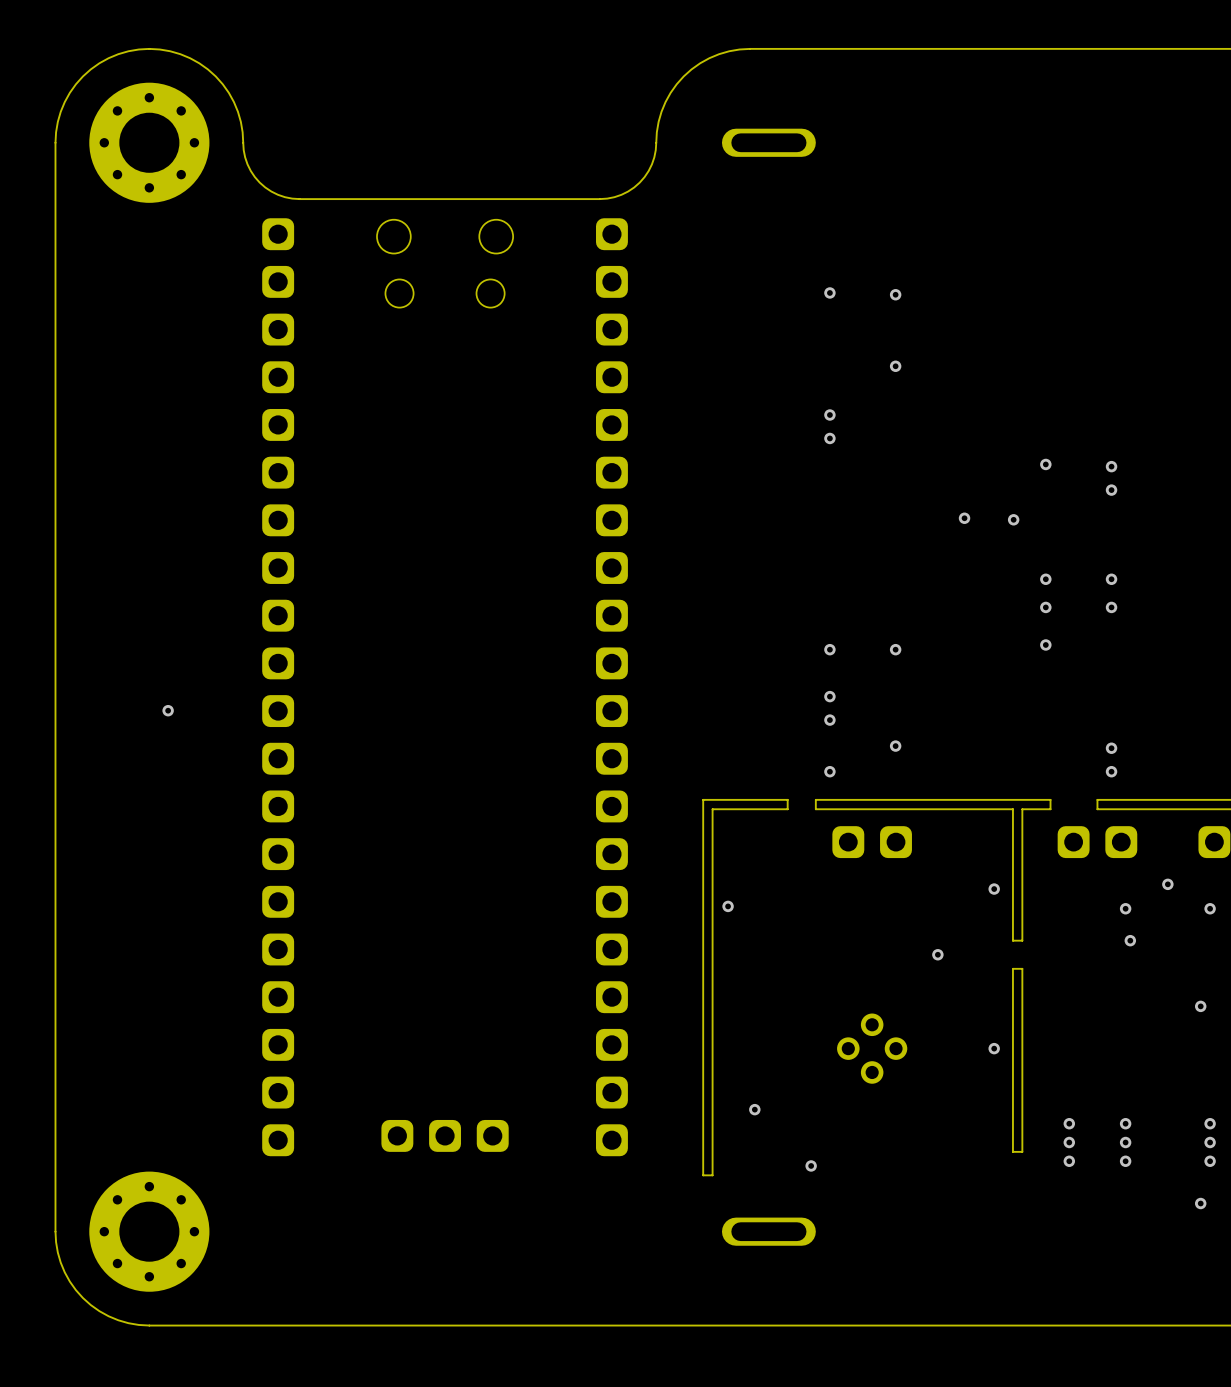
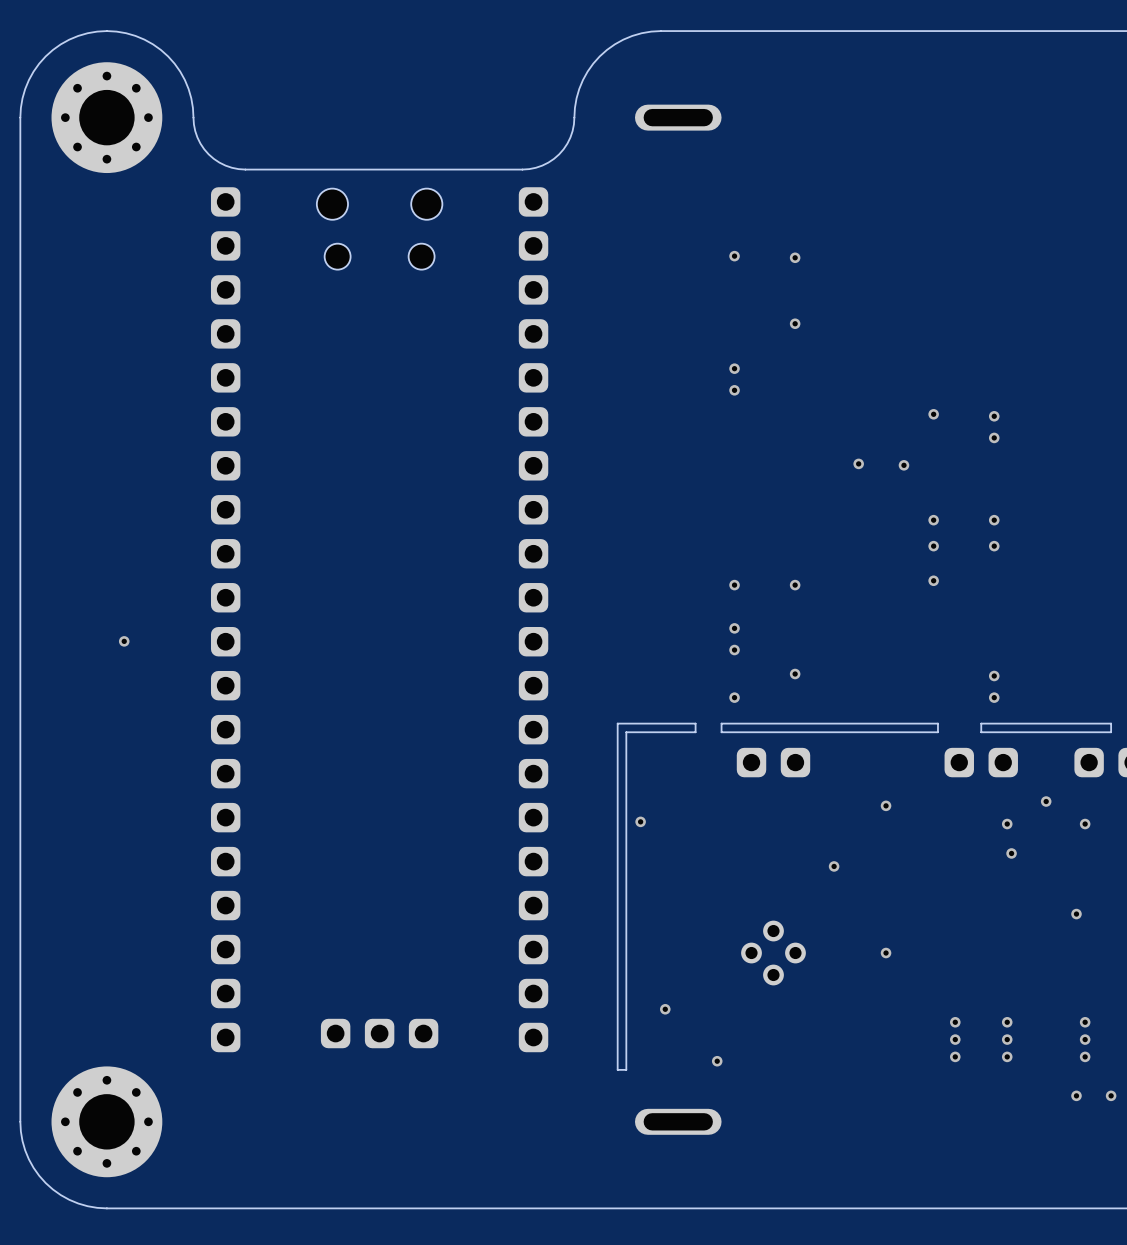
board edge: (1022, 809) (1022, 940) (1012, 940) (1012, 809) -> (912, 732) (903, 732)
board edge: (1022, 968) (1012, 968) (1012, 1151) (1022, 1151) (1022, 968) -> none

